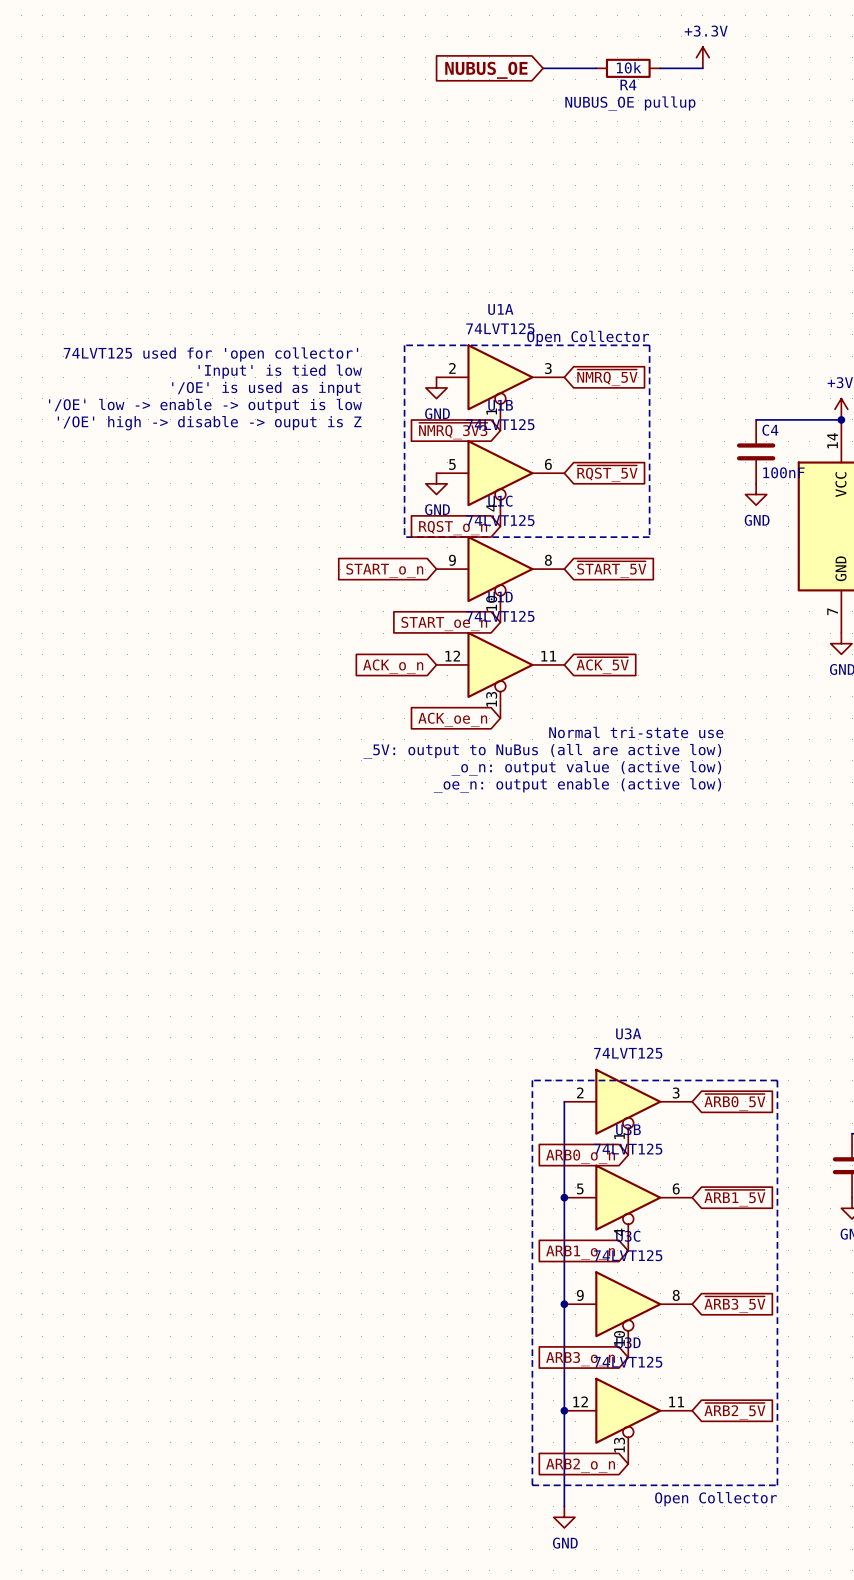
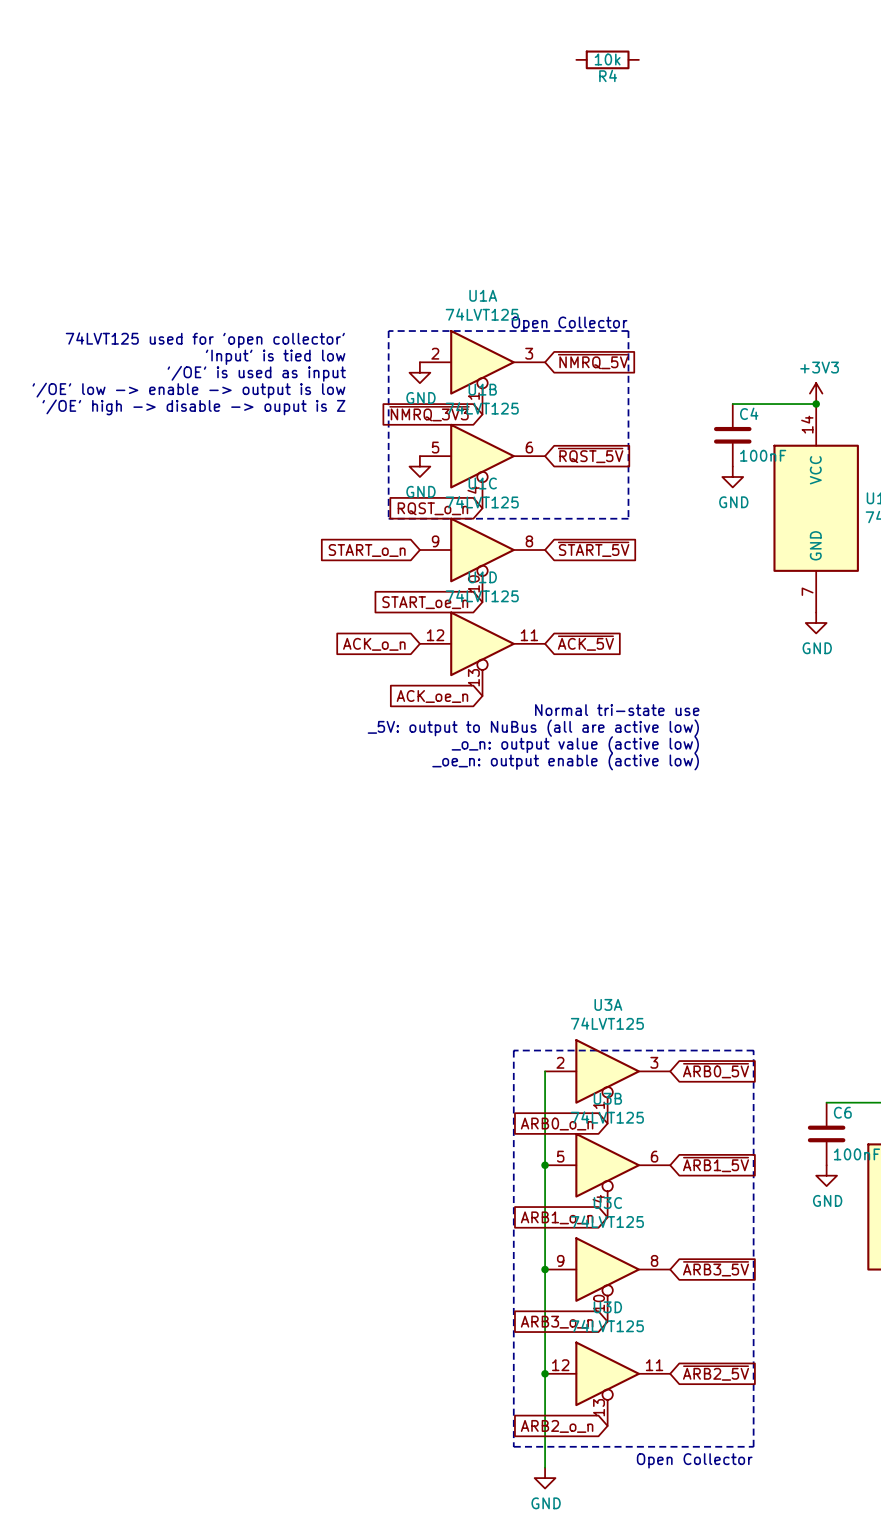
power symbol: +3.3V (702, 57) -> none
wire: (543, 68) (596, 68) -> none
wire: (660, 68) (702, 68) -> none
global label: NUBUS_OE (486, 70) -> none
text: NUBUS_OE pullup (630, 103) -> none

